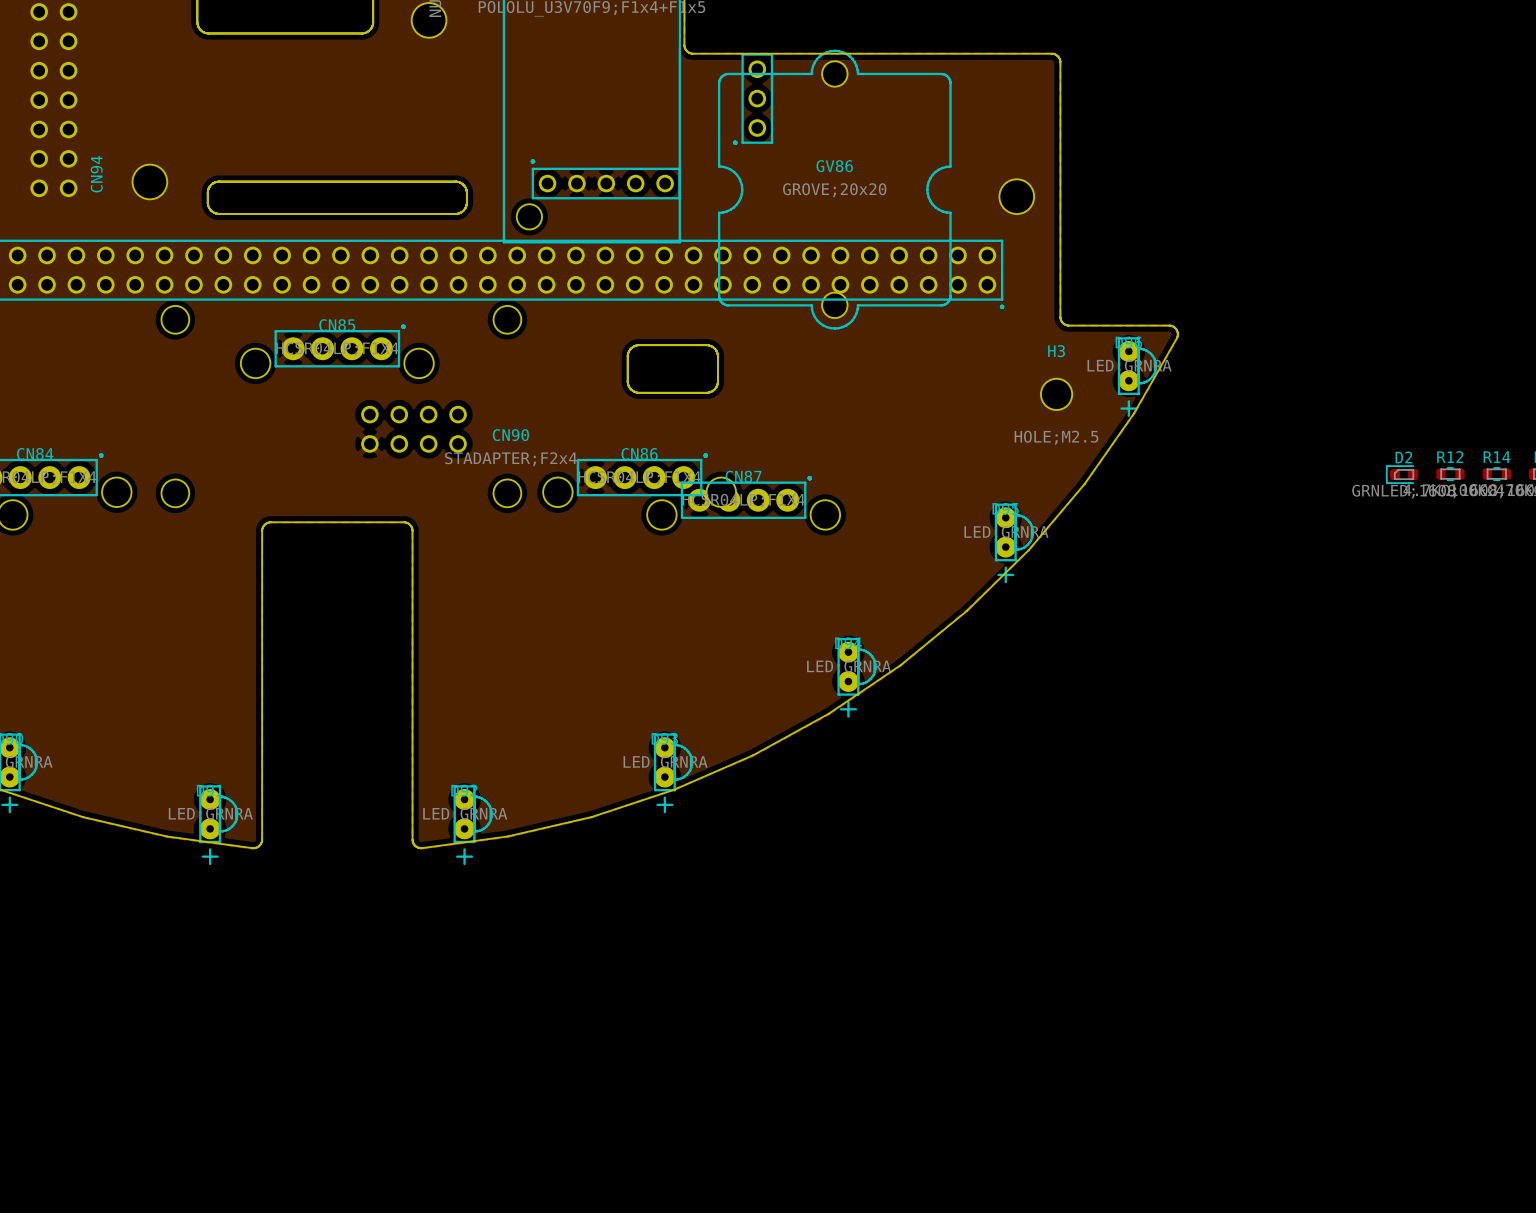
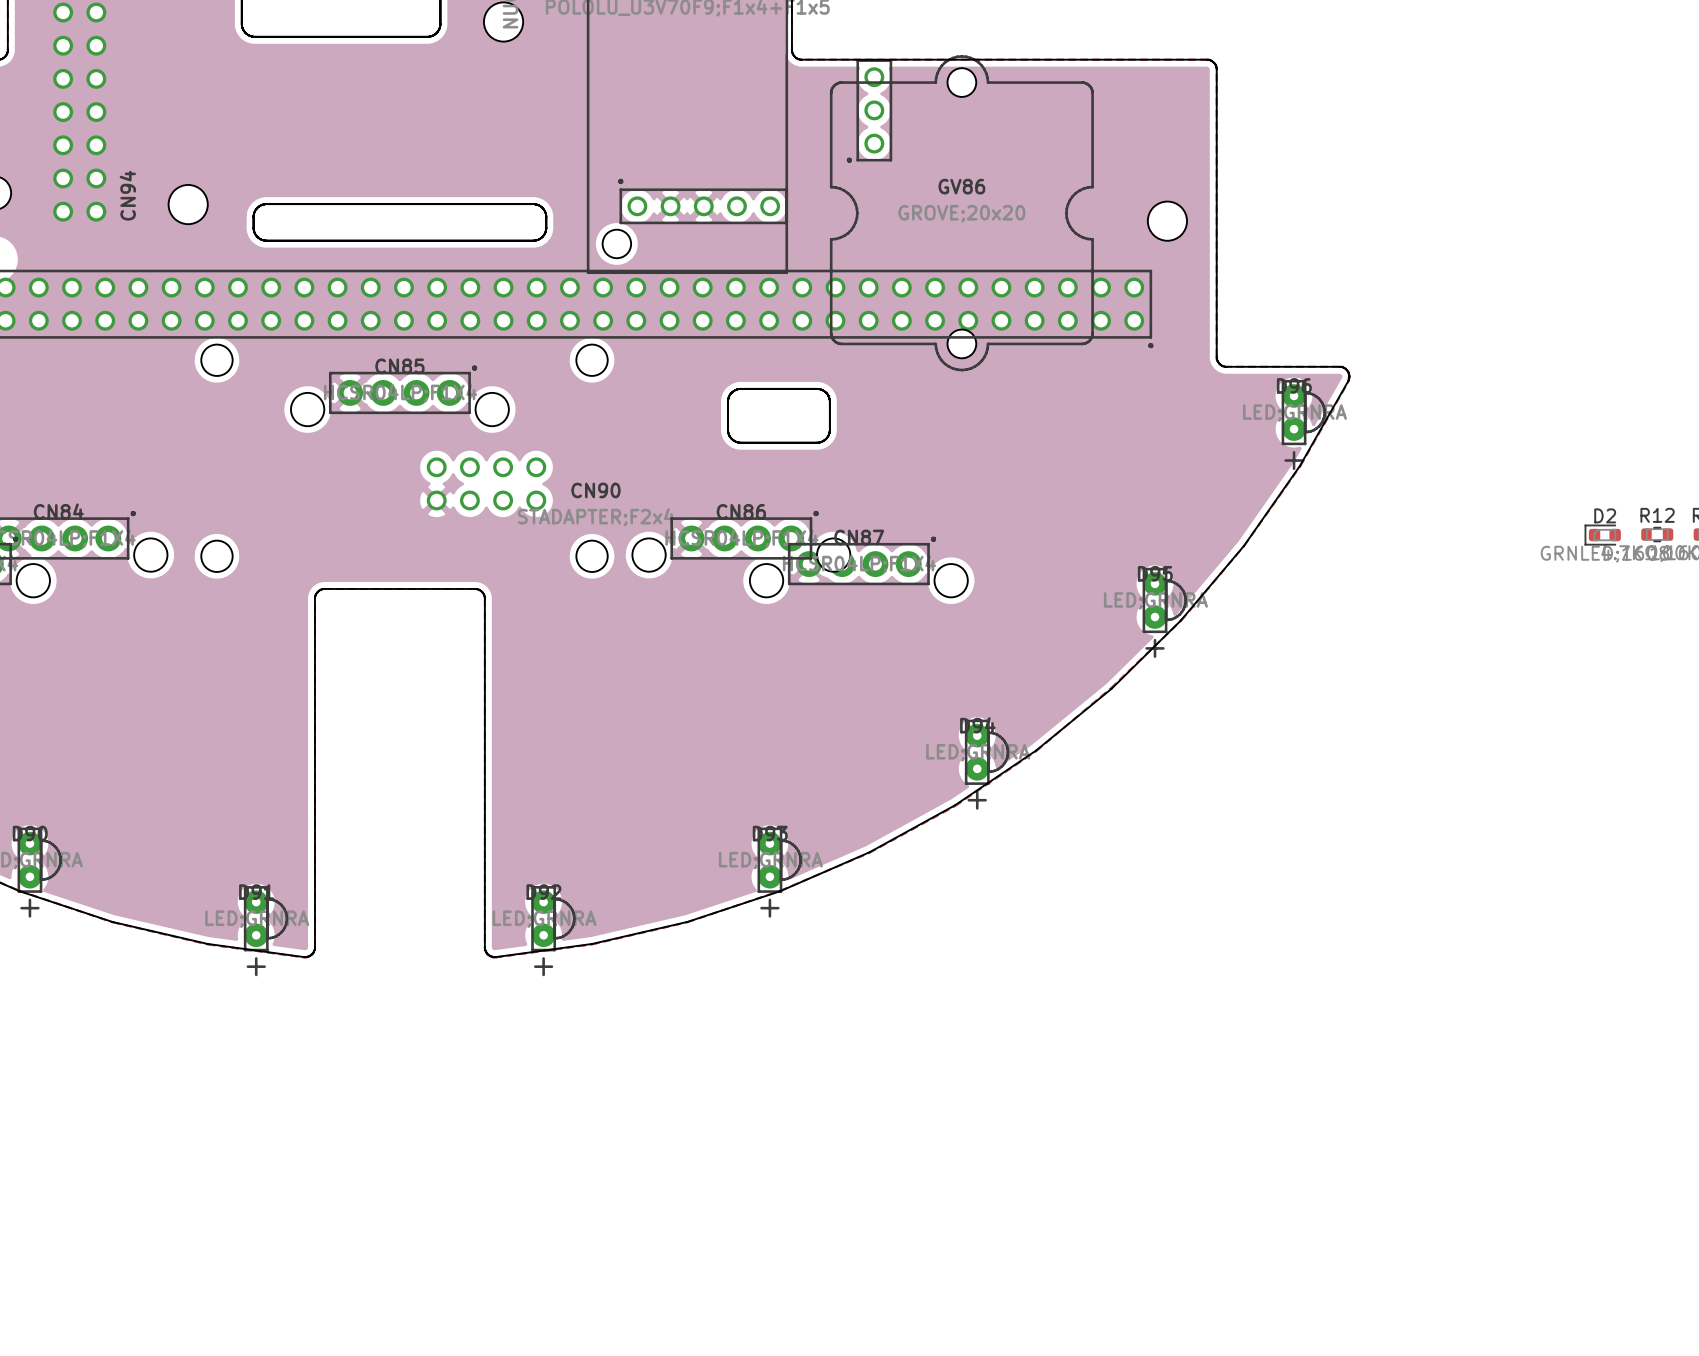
H3: HOLE;M2.5 (1056, 394) -> none

